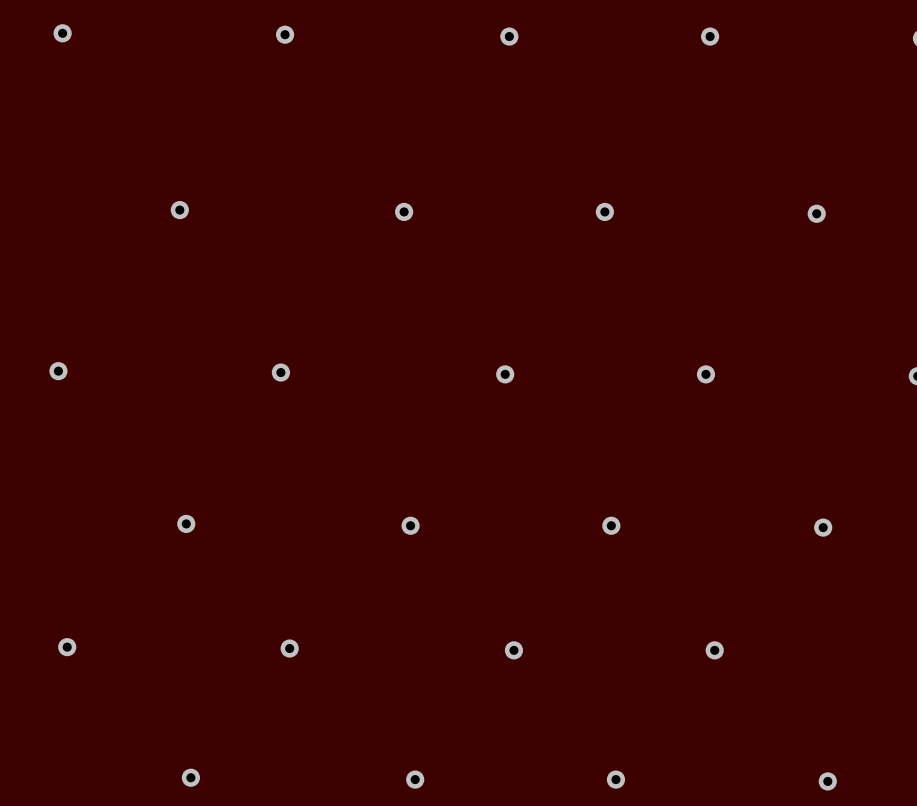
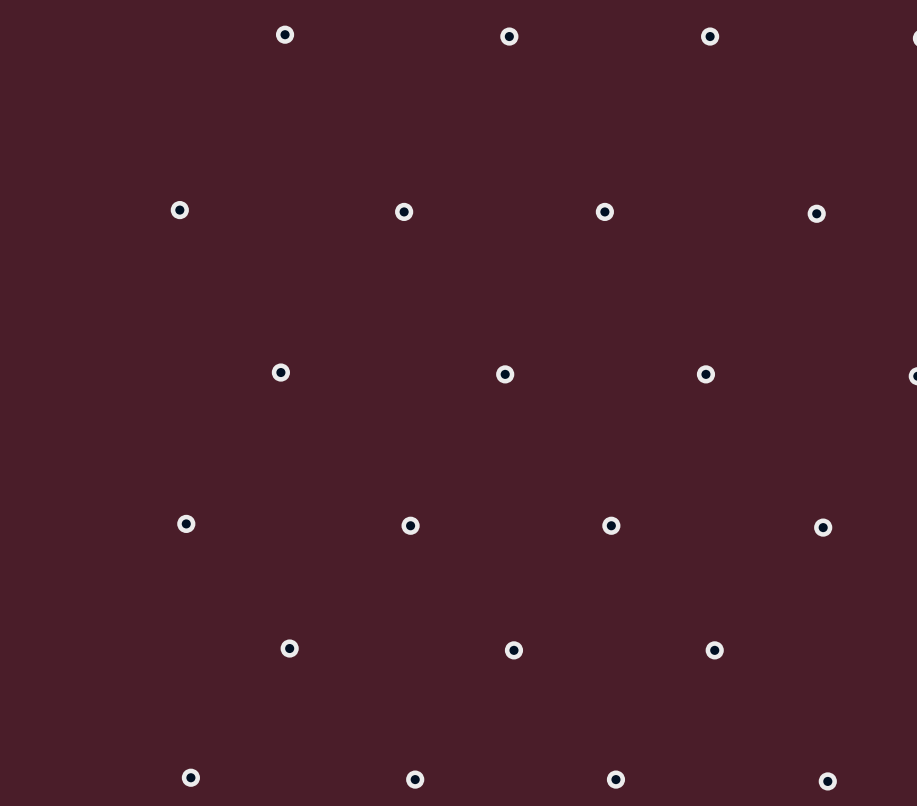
via: (62, 33) -> none
via: (58, 371) -> none
via: (67, 647) -> none

